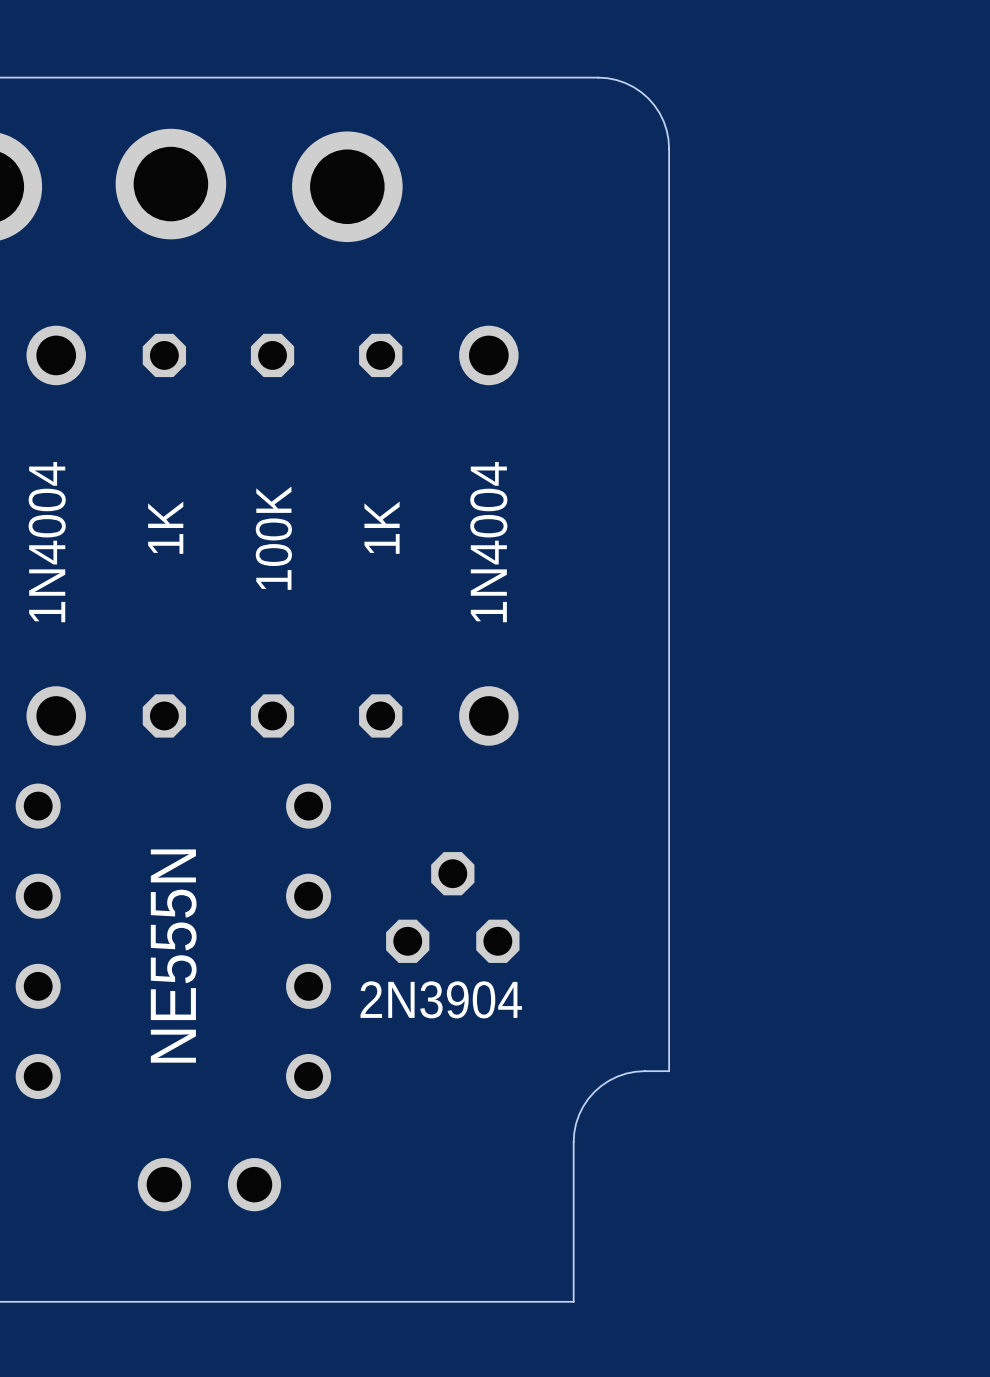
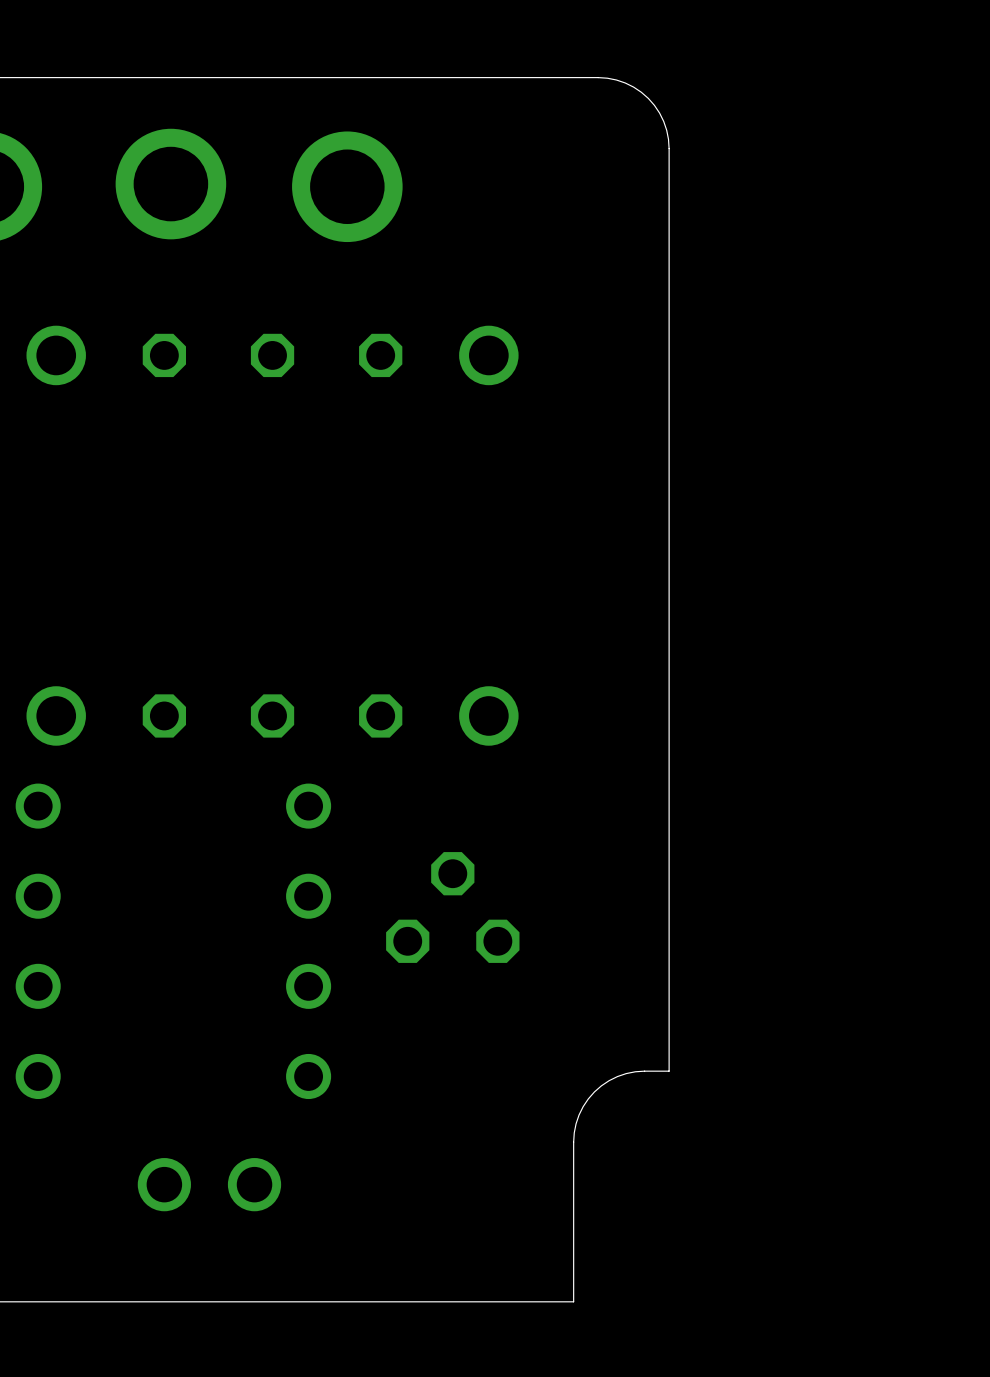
text: 1K (165, 527) -> none
text: 1K (382, 527) -> none
text: 100K (273, 538) -> none
text: 1N4004 (47, 542) -> none
text: 1N4004 (488, 542) -> none
text: NE555N (173, 956) -> none
text: 2N3904 (441, 999) -> none

